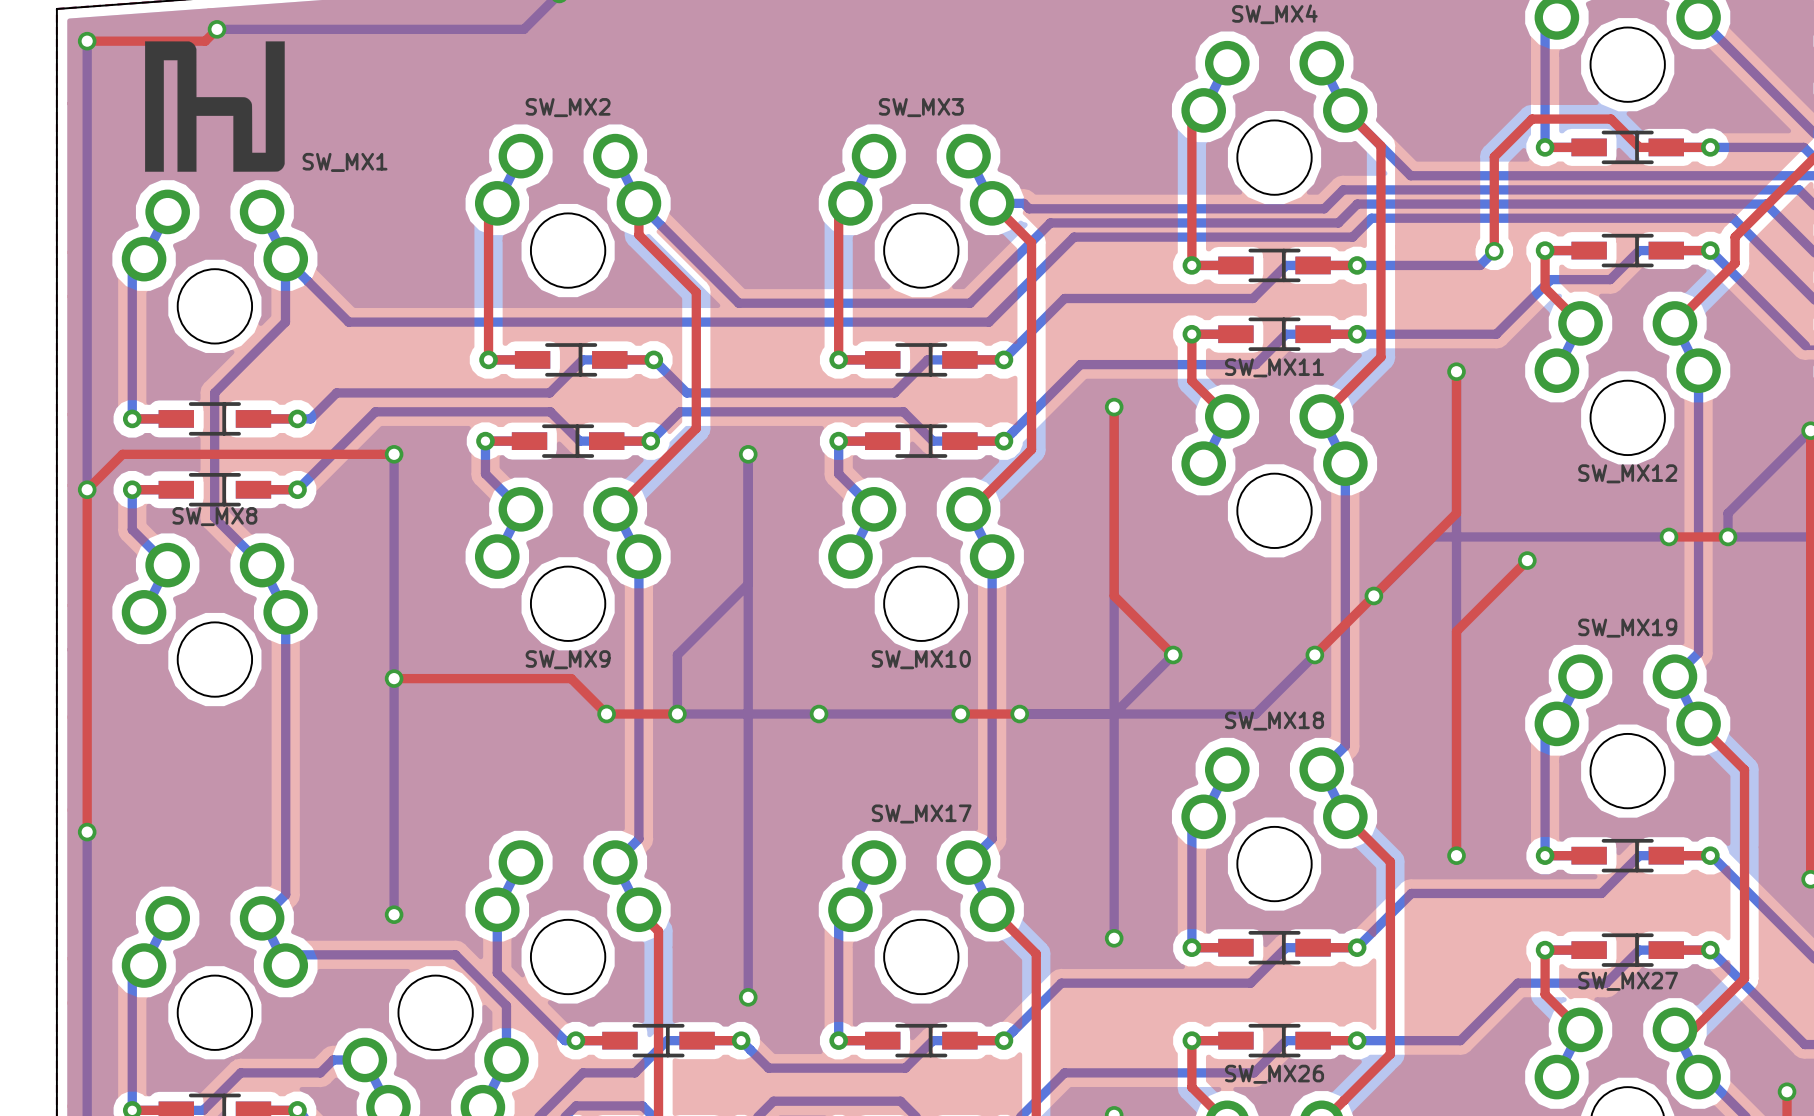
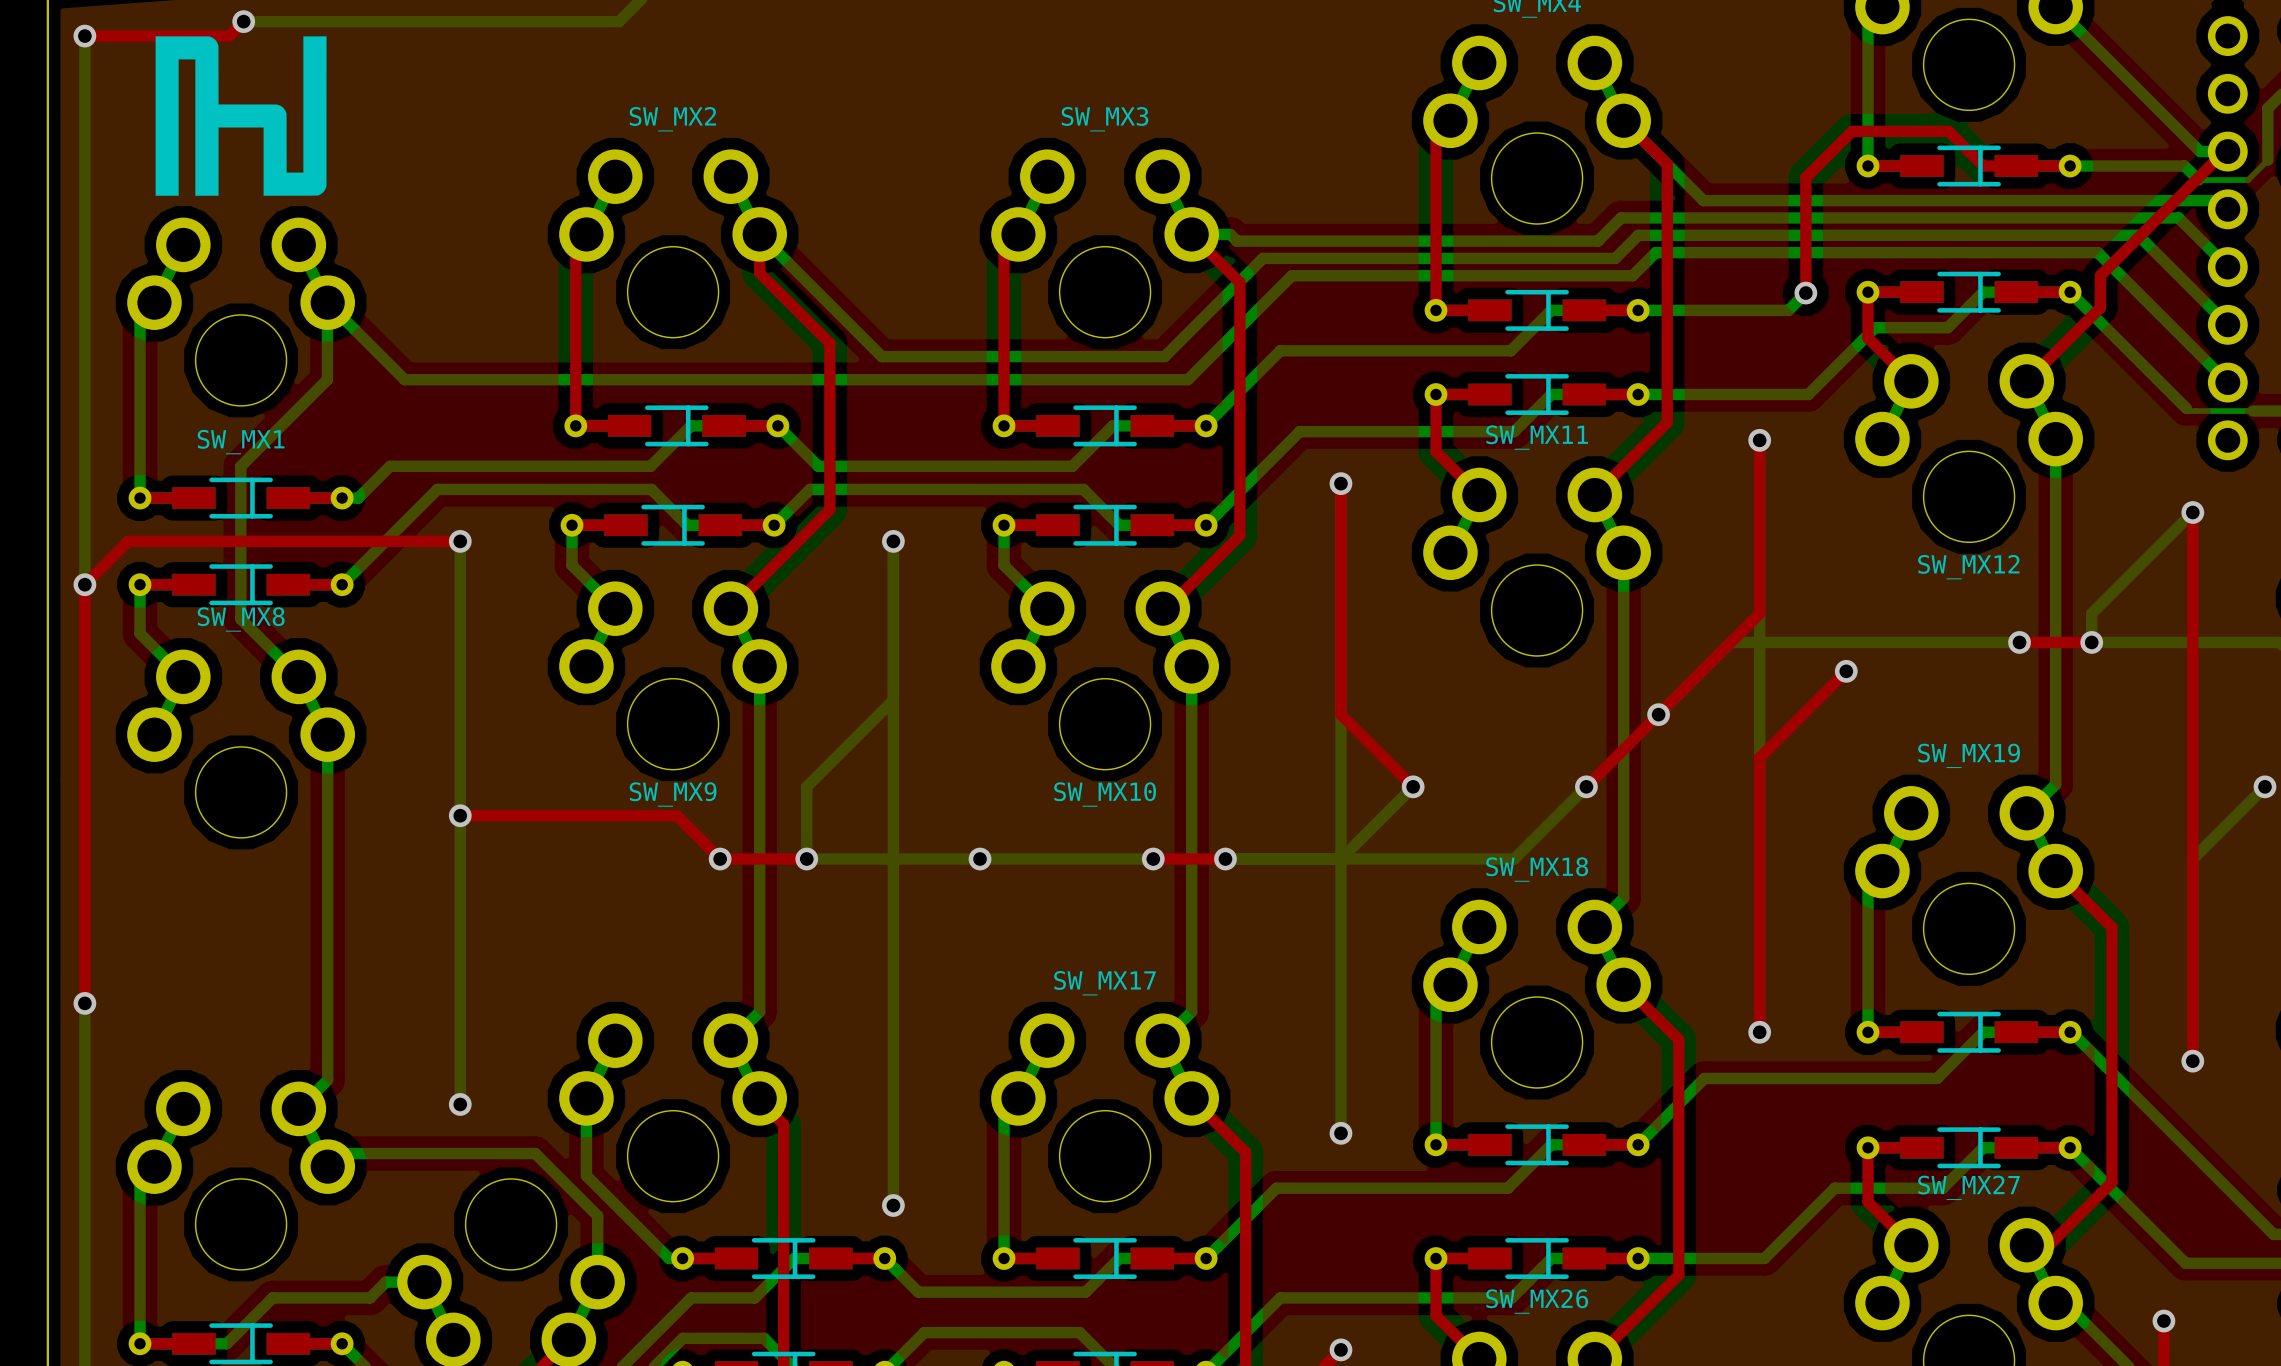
SW_MX1 name position: SW_MX1 (345, 162) -> SW_MX1 (241, 442)

